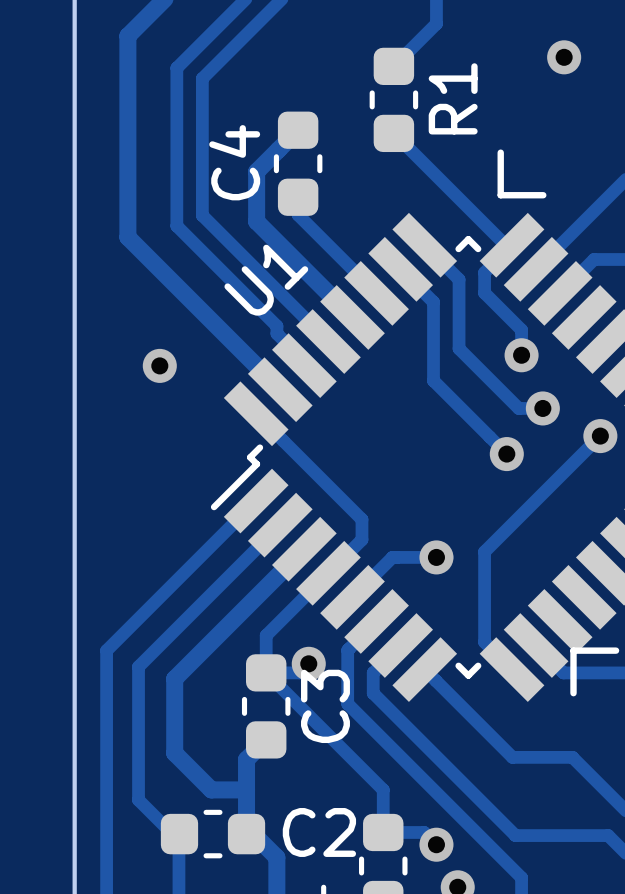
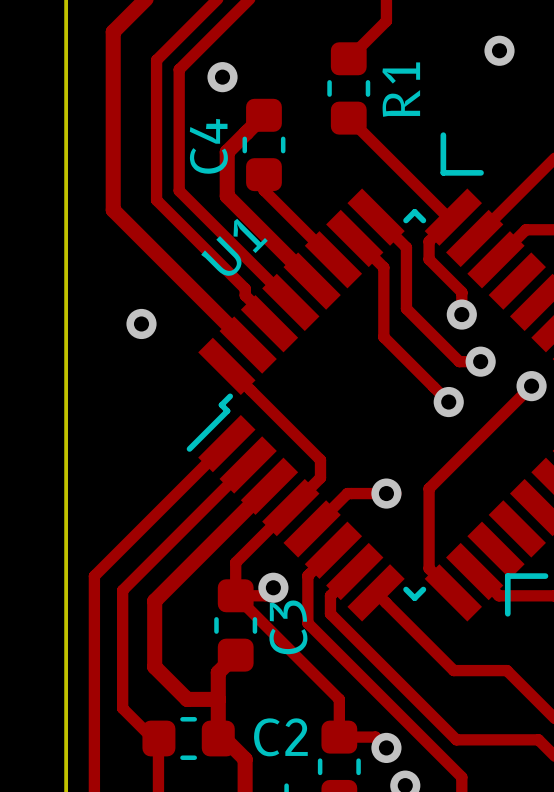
via: none -> (222, 77)

